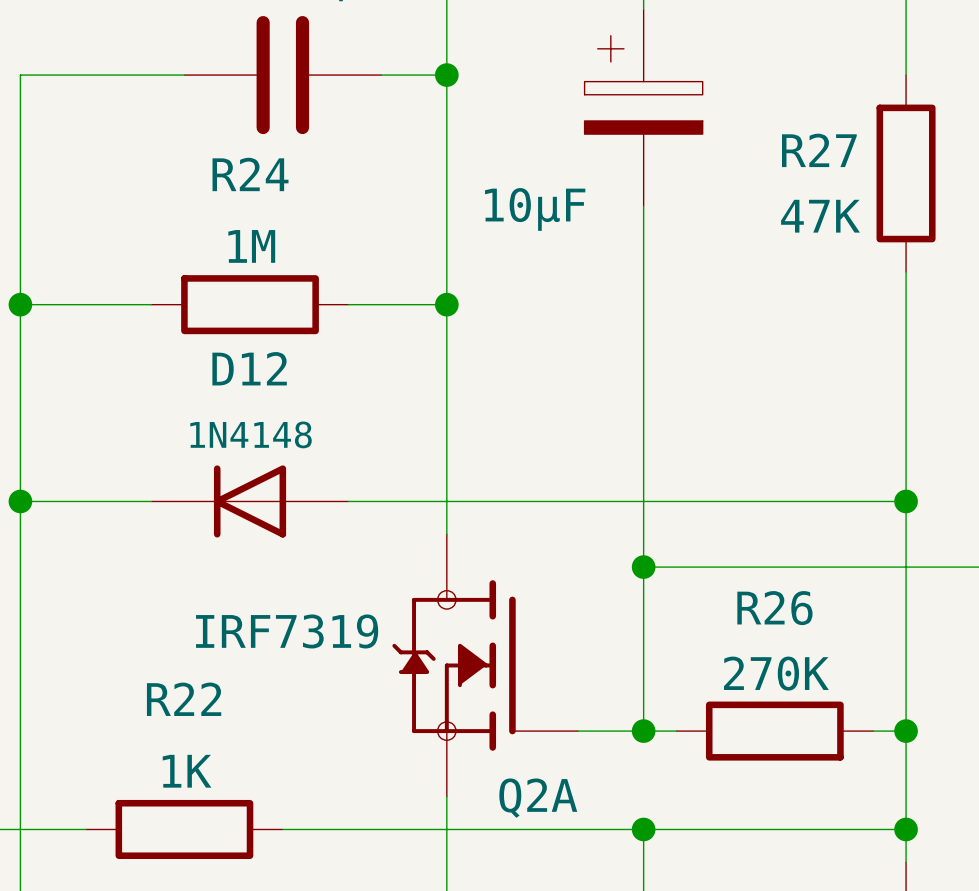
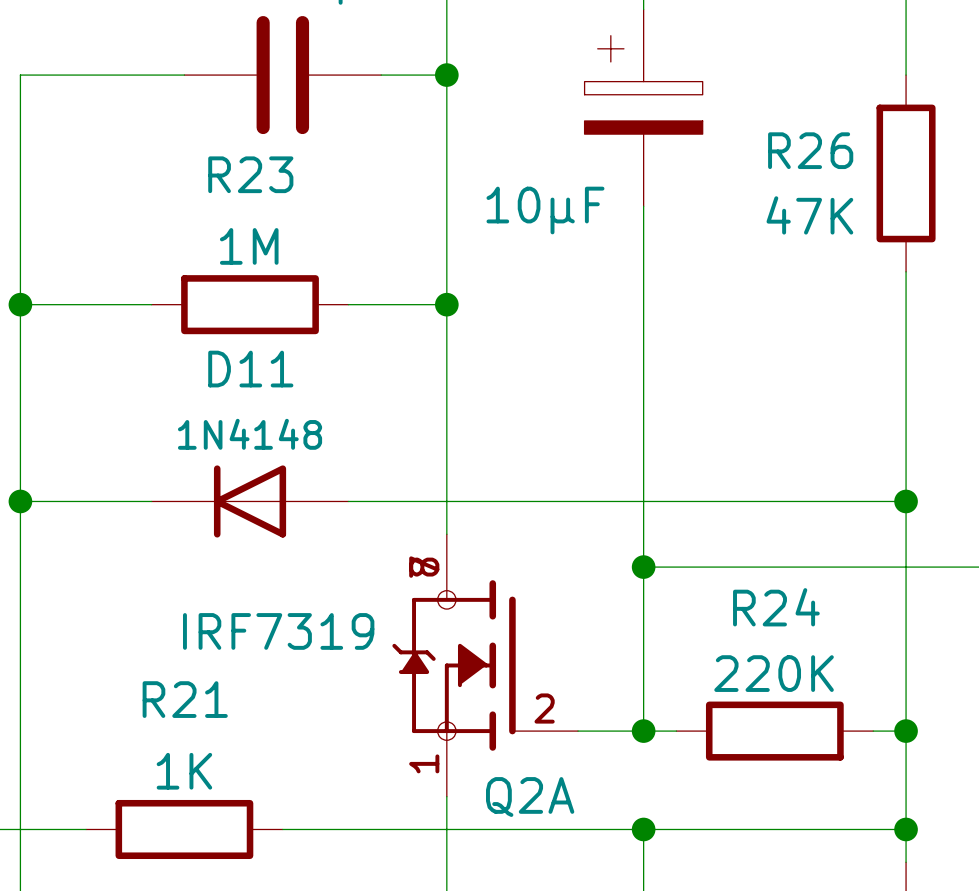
R27 name: R27 (819, 150) -> R26 (810, 150)
R24 name: R24 (250, 174) -> R23 (250, 174)
D12 name: D12 (249, 368) -> D11 (250, 369)
Q2A symbol: [392, 534, 579, 797] -> [392, 534, 579, 797]
R26 name: R26 (774, 608) -> R24 (776, 607)
R26 value: 270K (776, 673) -> 220K (774, 673)
R22 name: R22 (184, 699) -> R21 (185, 699)

